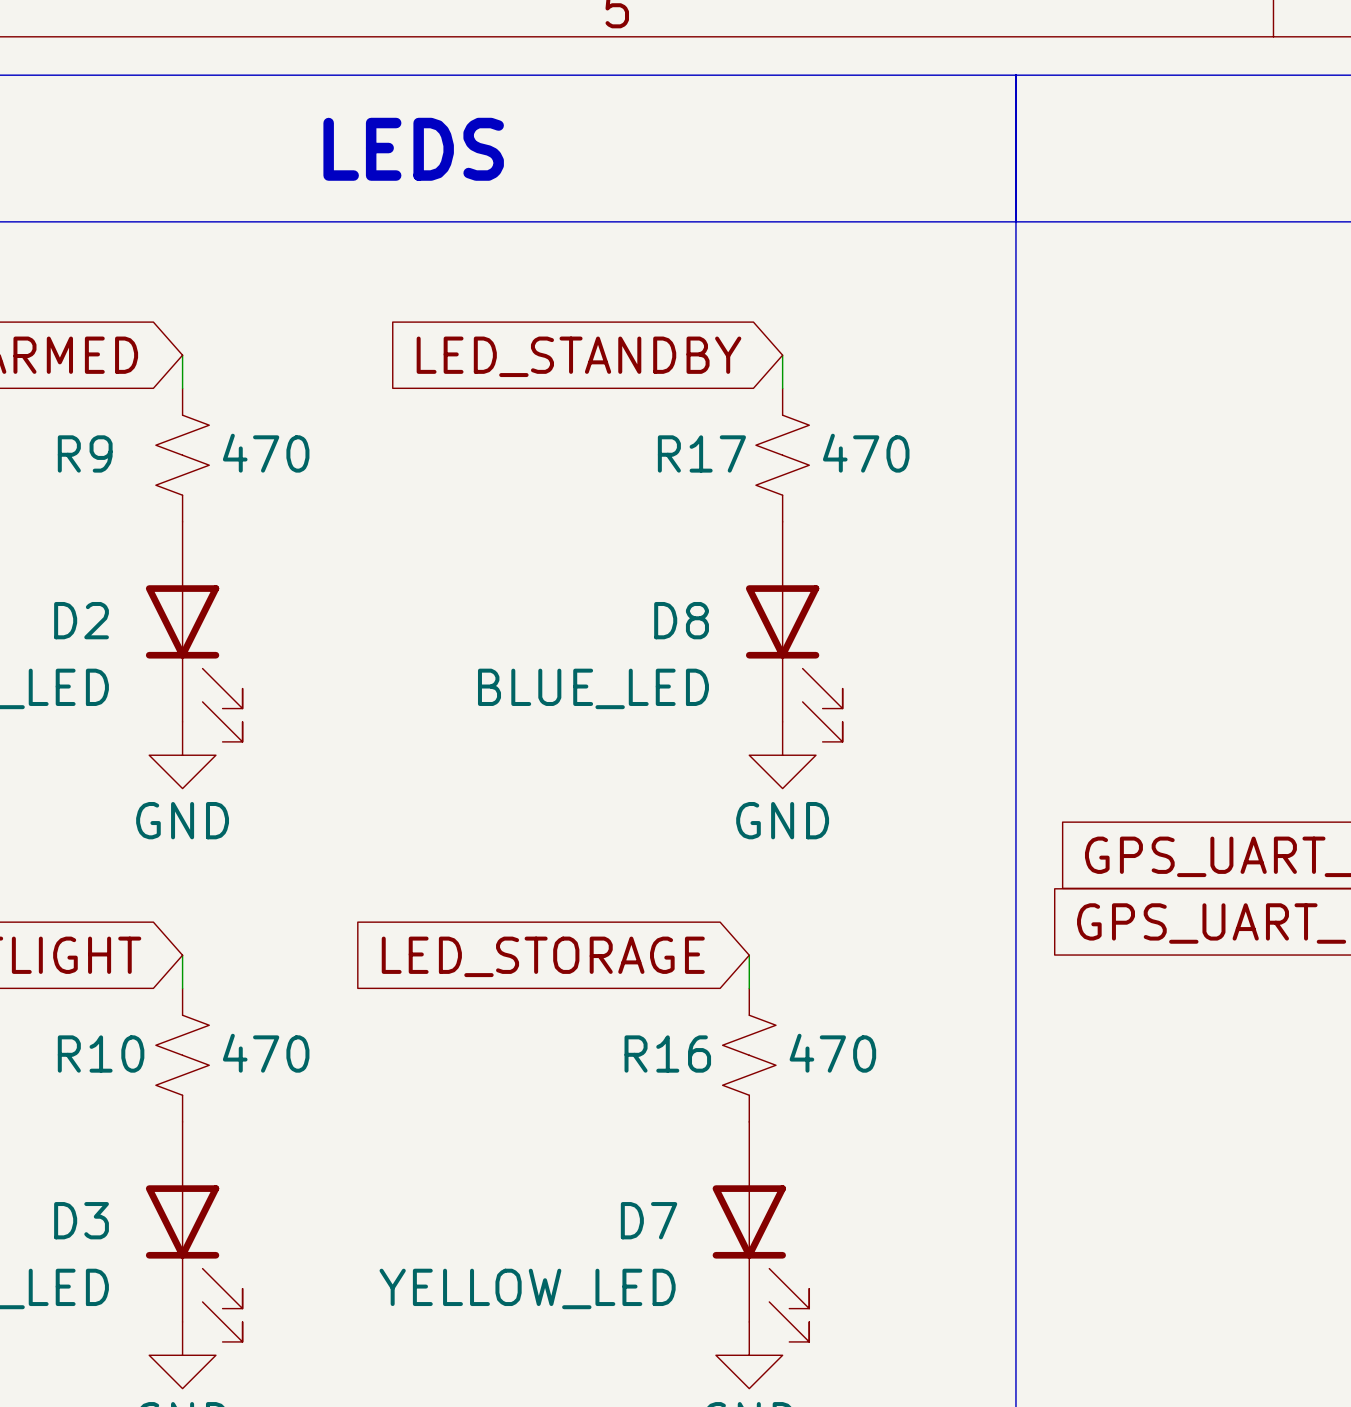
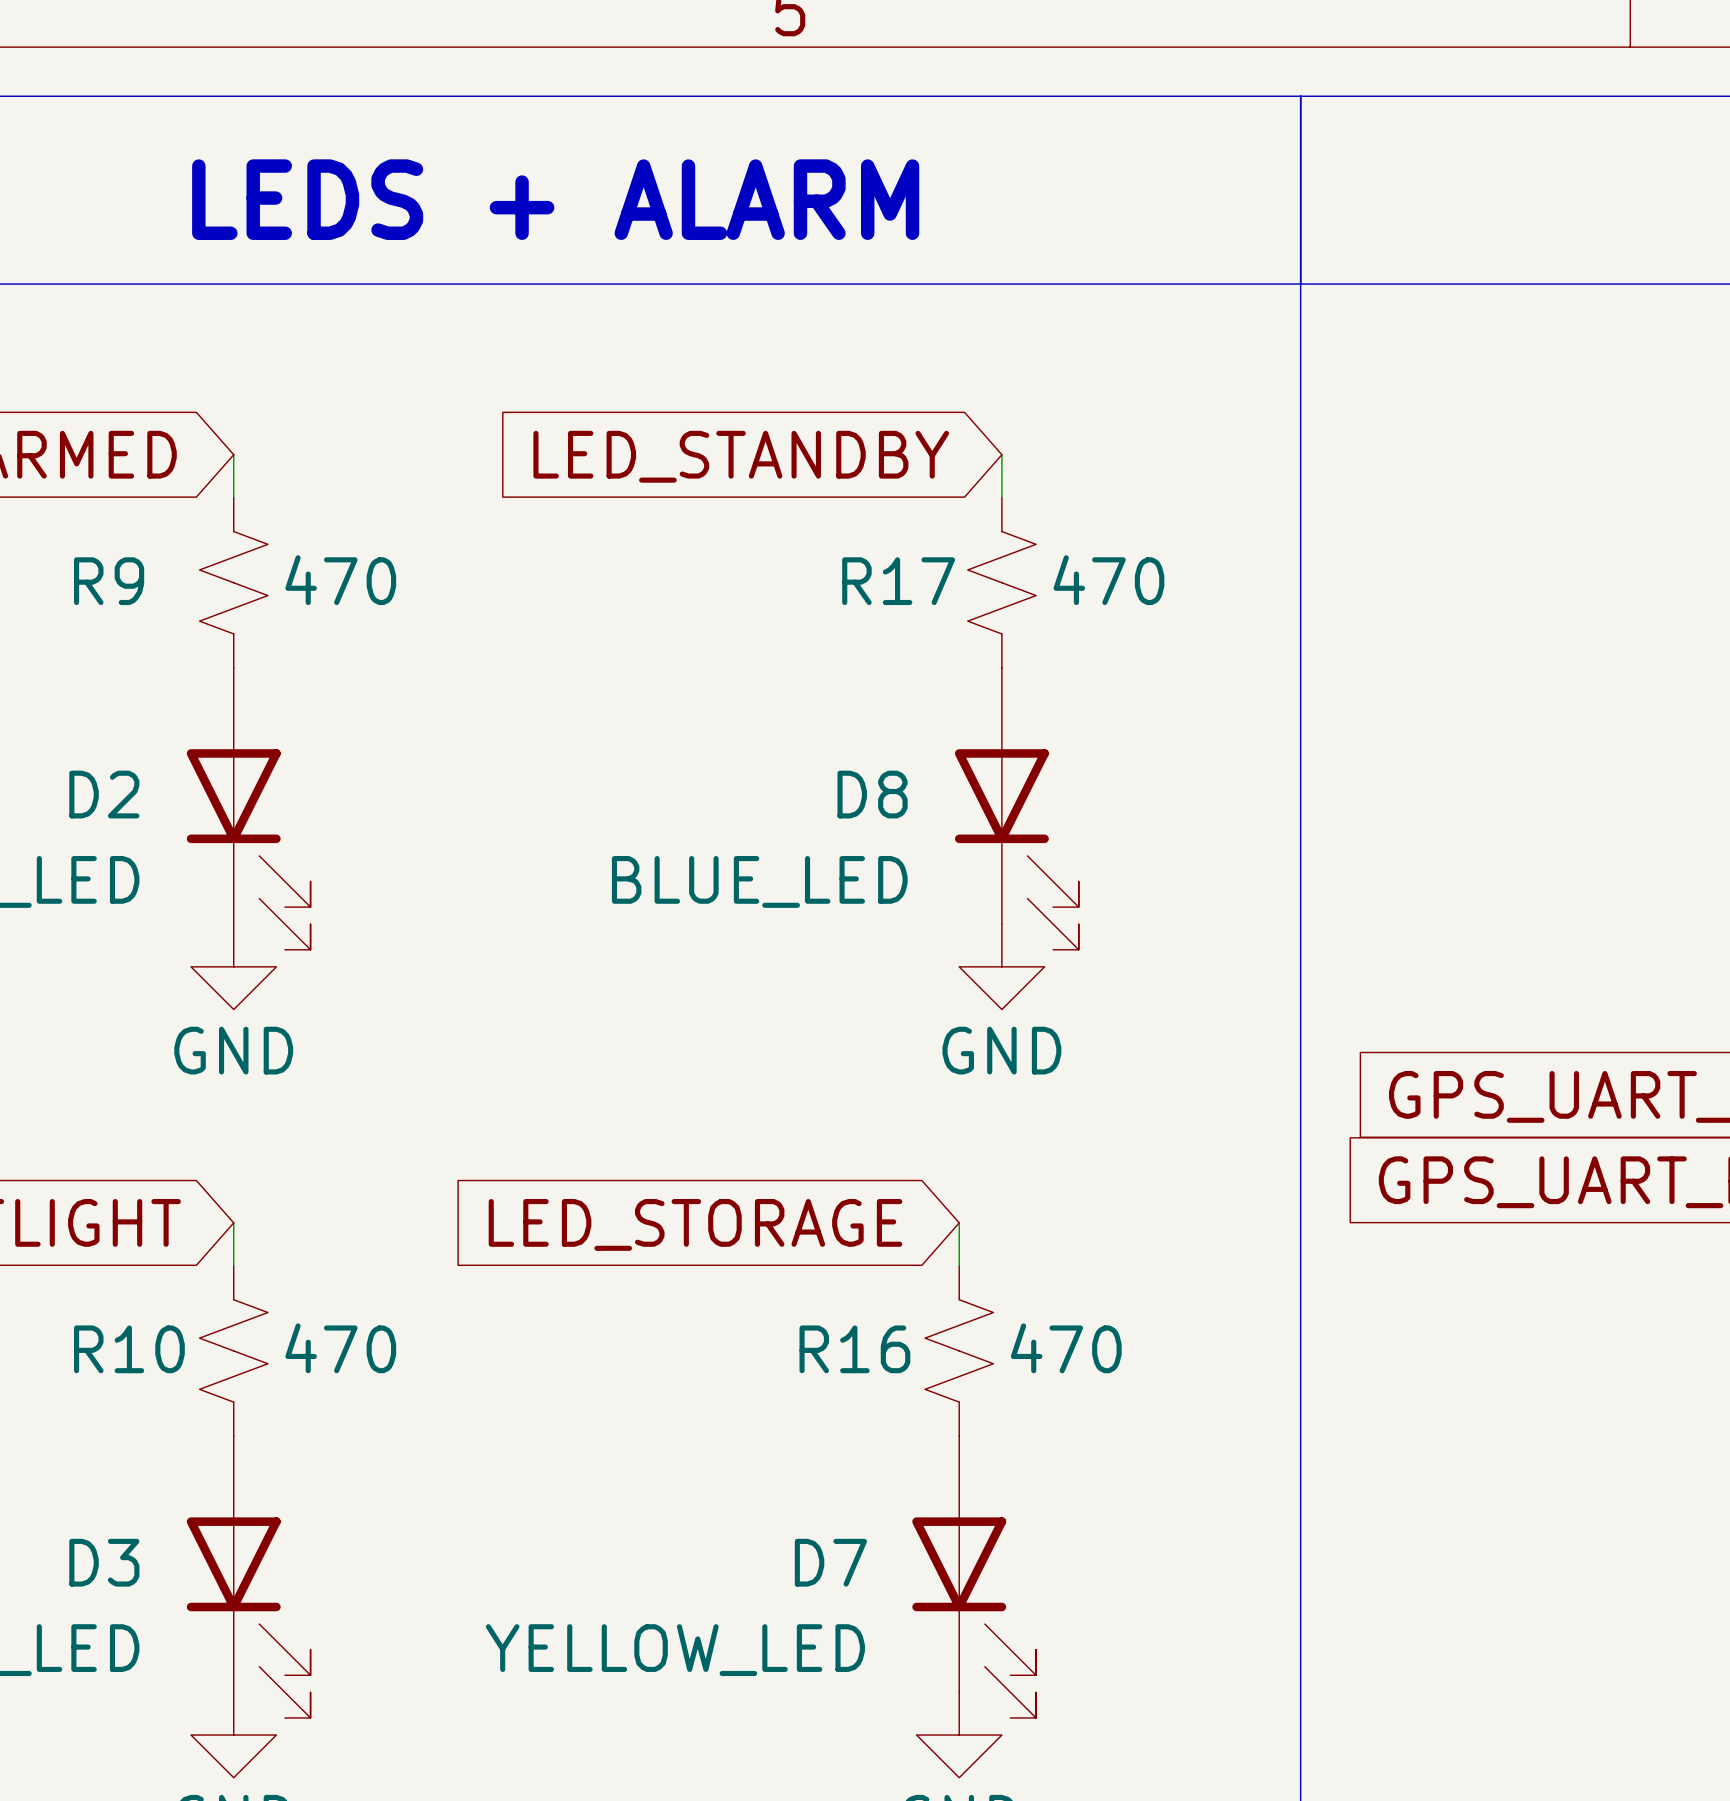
text: LEDS (413, 149) -> none
text: none -> LEDS + ALARM (555, 199)

